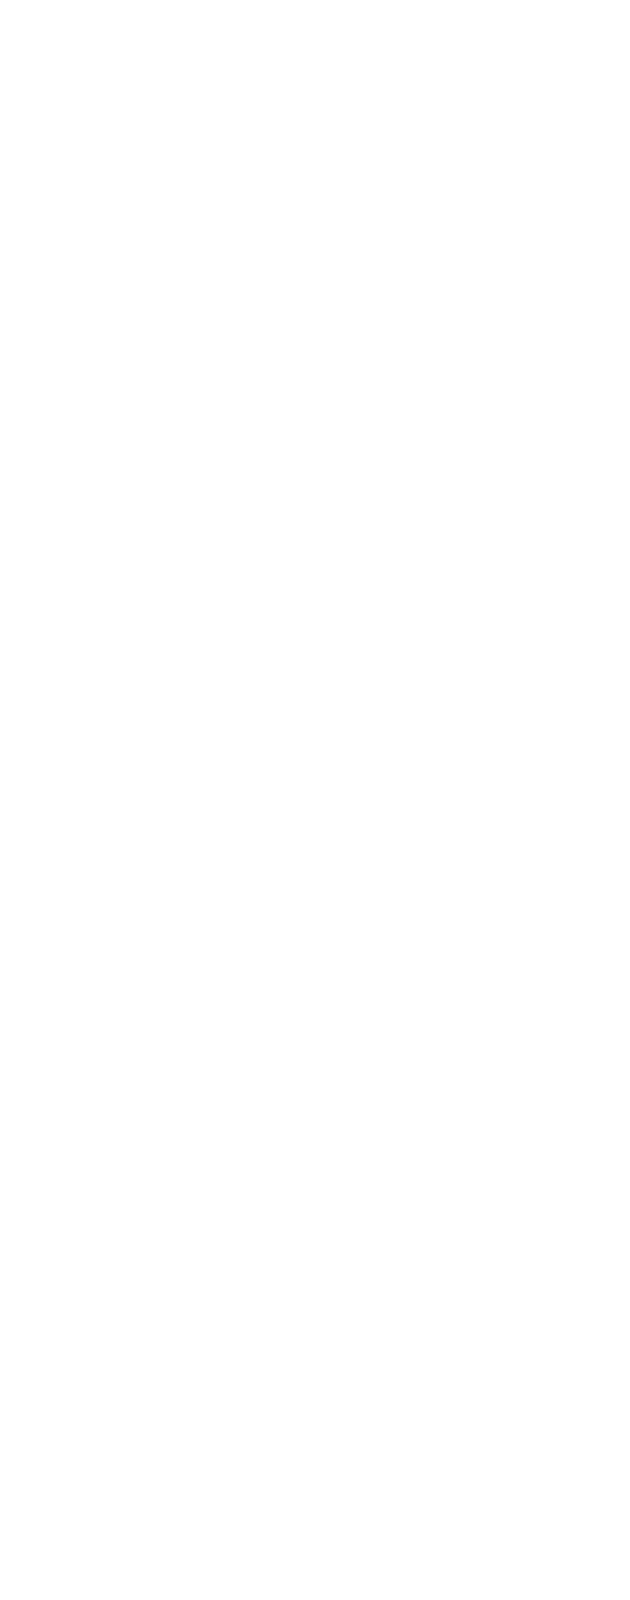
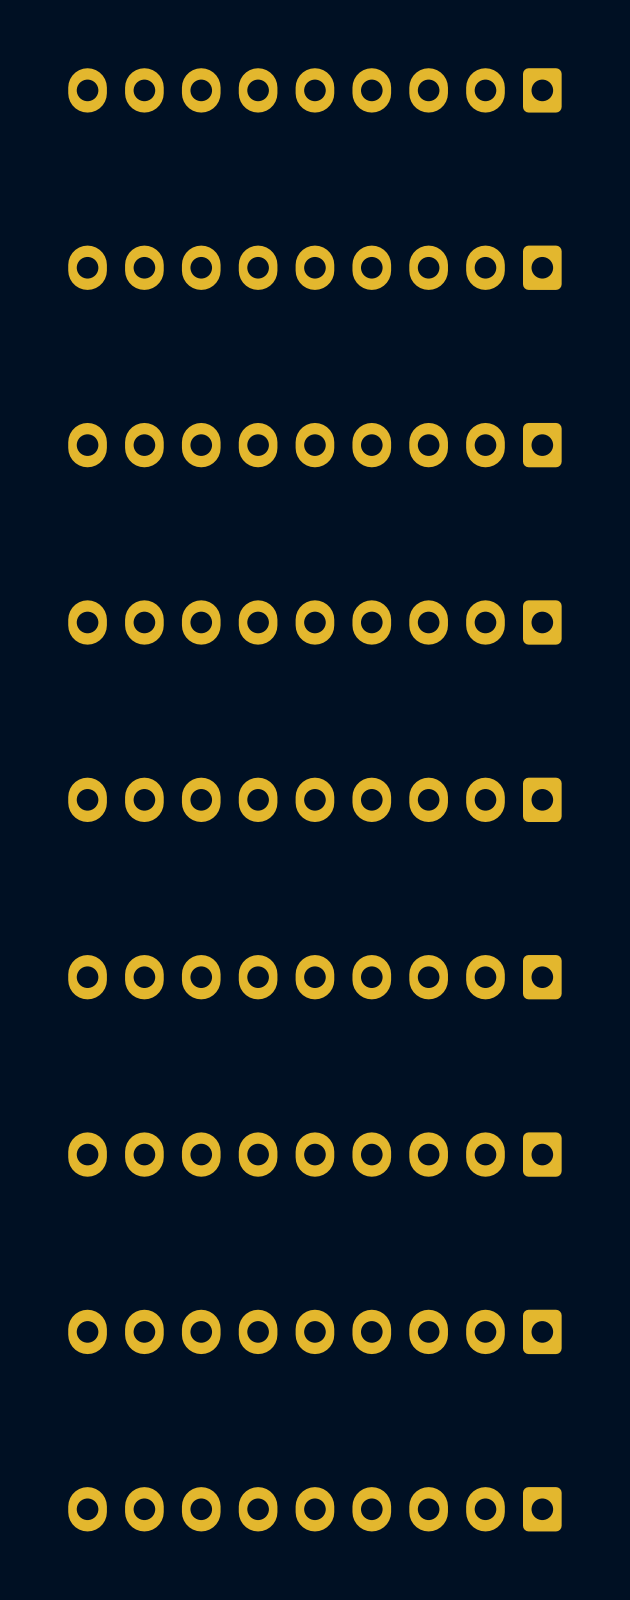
part: none -> (314, 90)
part: none -> (314, 267)
part: none -> (314, 445)
part: none -> (314, 622)
part: none -> (314, 799)
part: none -> (314, 977)
part: none -> (314, 1154)
part: none -> (314, 1331)
part: none -> (314, 1509)

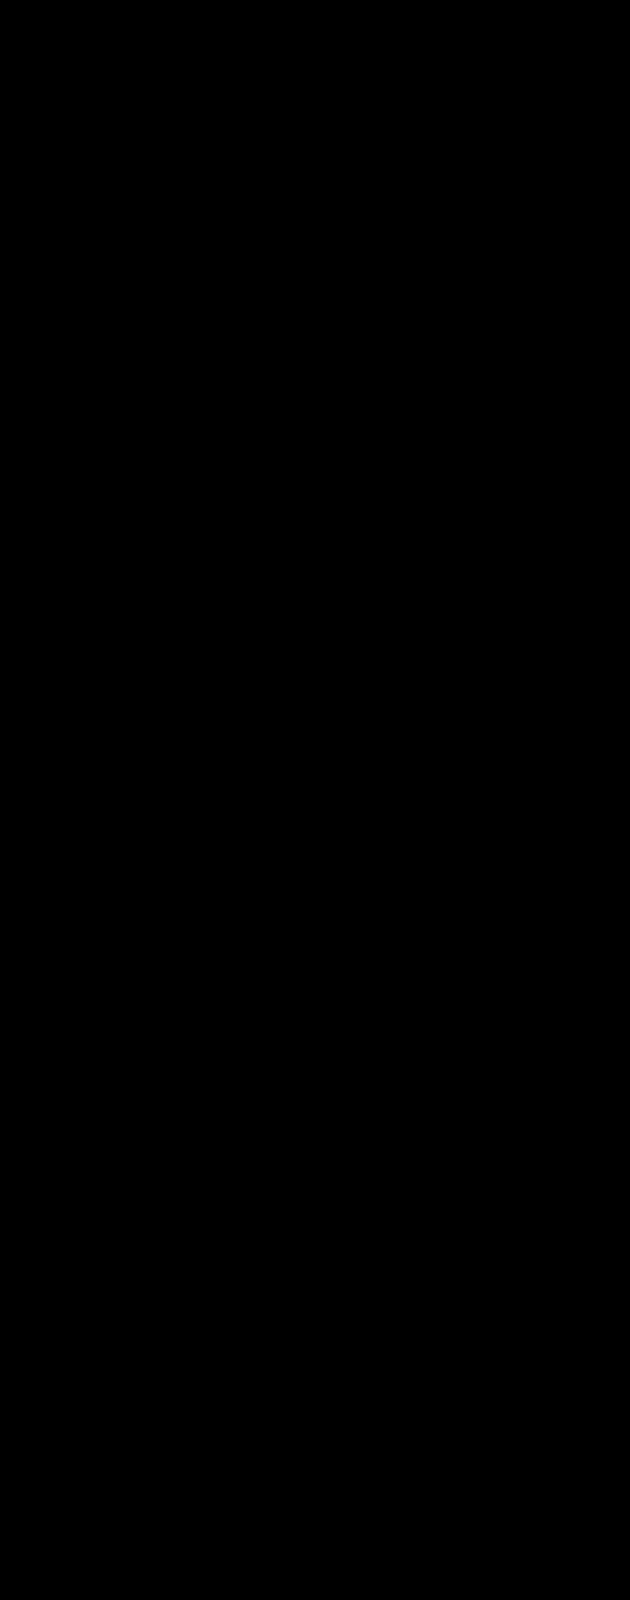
part: (314, 90) -> none
part: (314, 267) -> none
part: (314, 445) -> none
part: (314, 622) -> none
part: (314, 799) -> none
part: (314, 977) -> none
part: (314, 1154) -> none
part: (314, 1331) -> none
part: (314, 1509) -> none

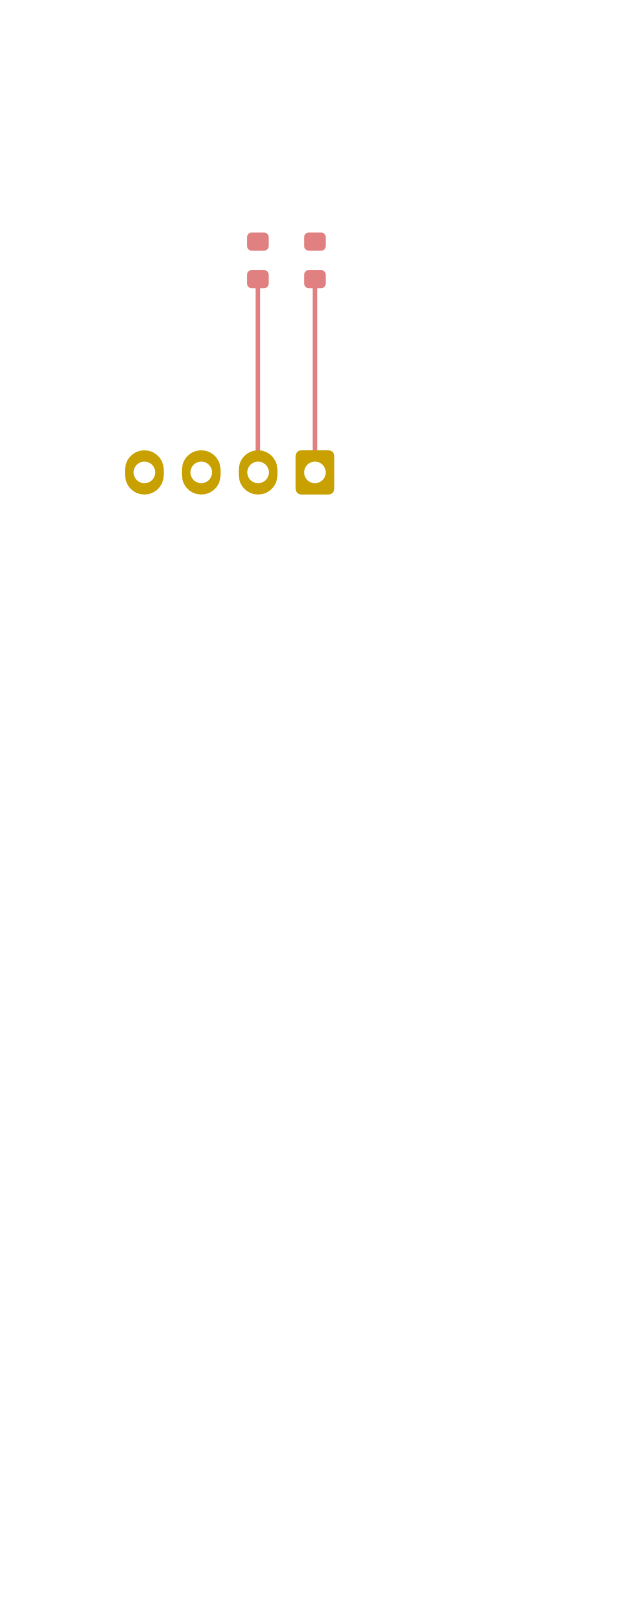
part: none -> (257, 260)
part: none -> (314, 260)
top track: none -> (257, 279) (257, 472)
top track: none -> (314, 279) (314, 472)
part: none -> (229, 472)

